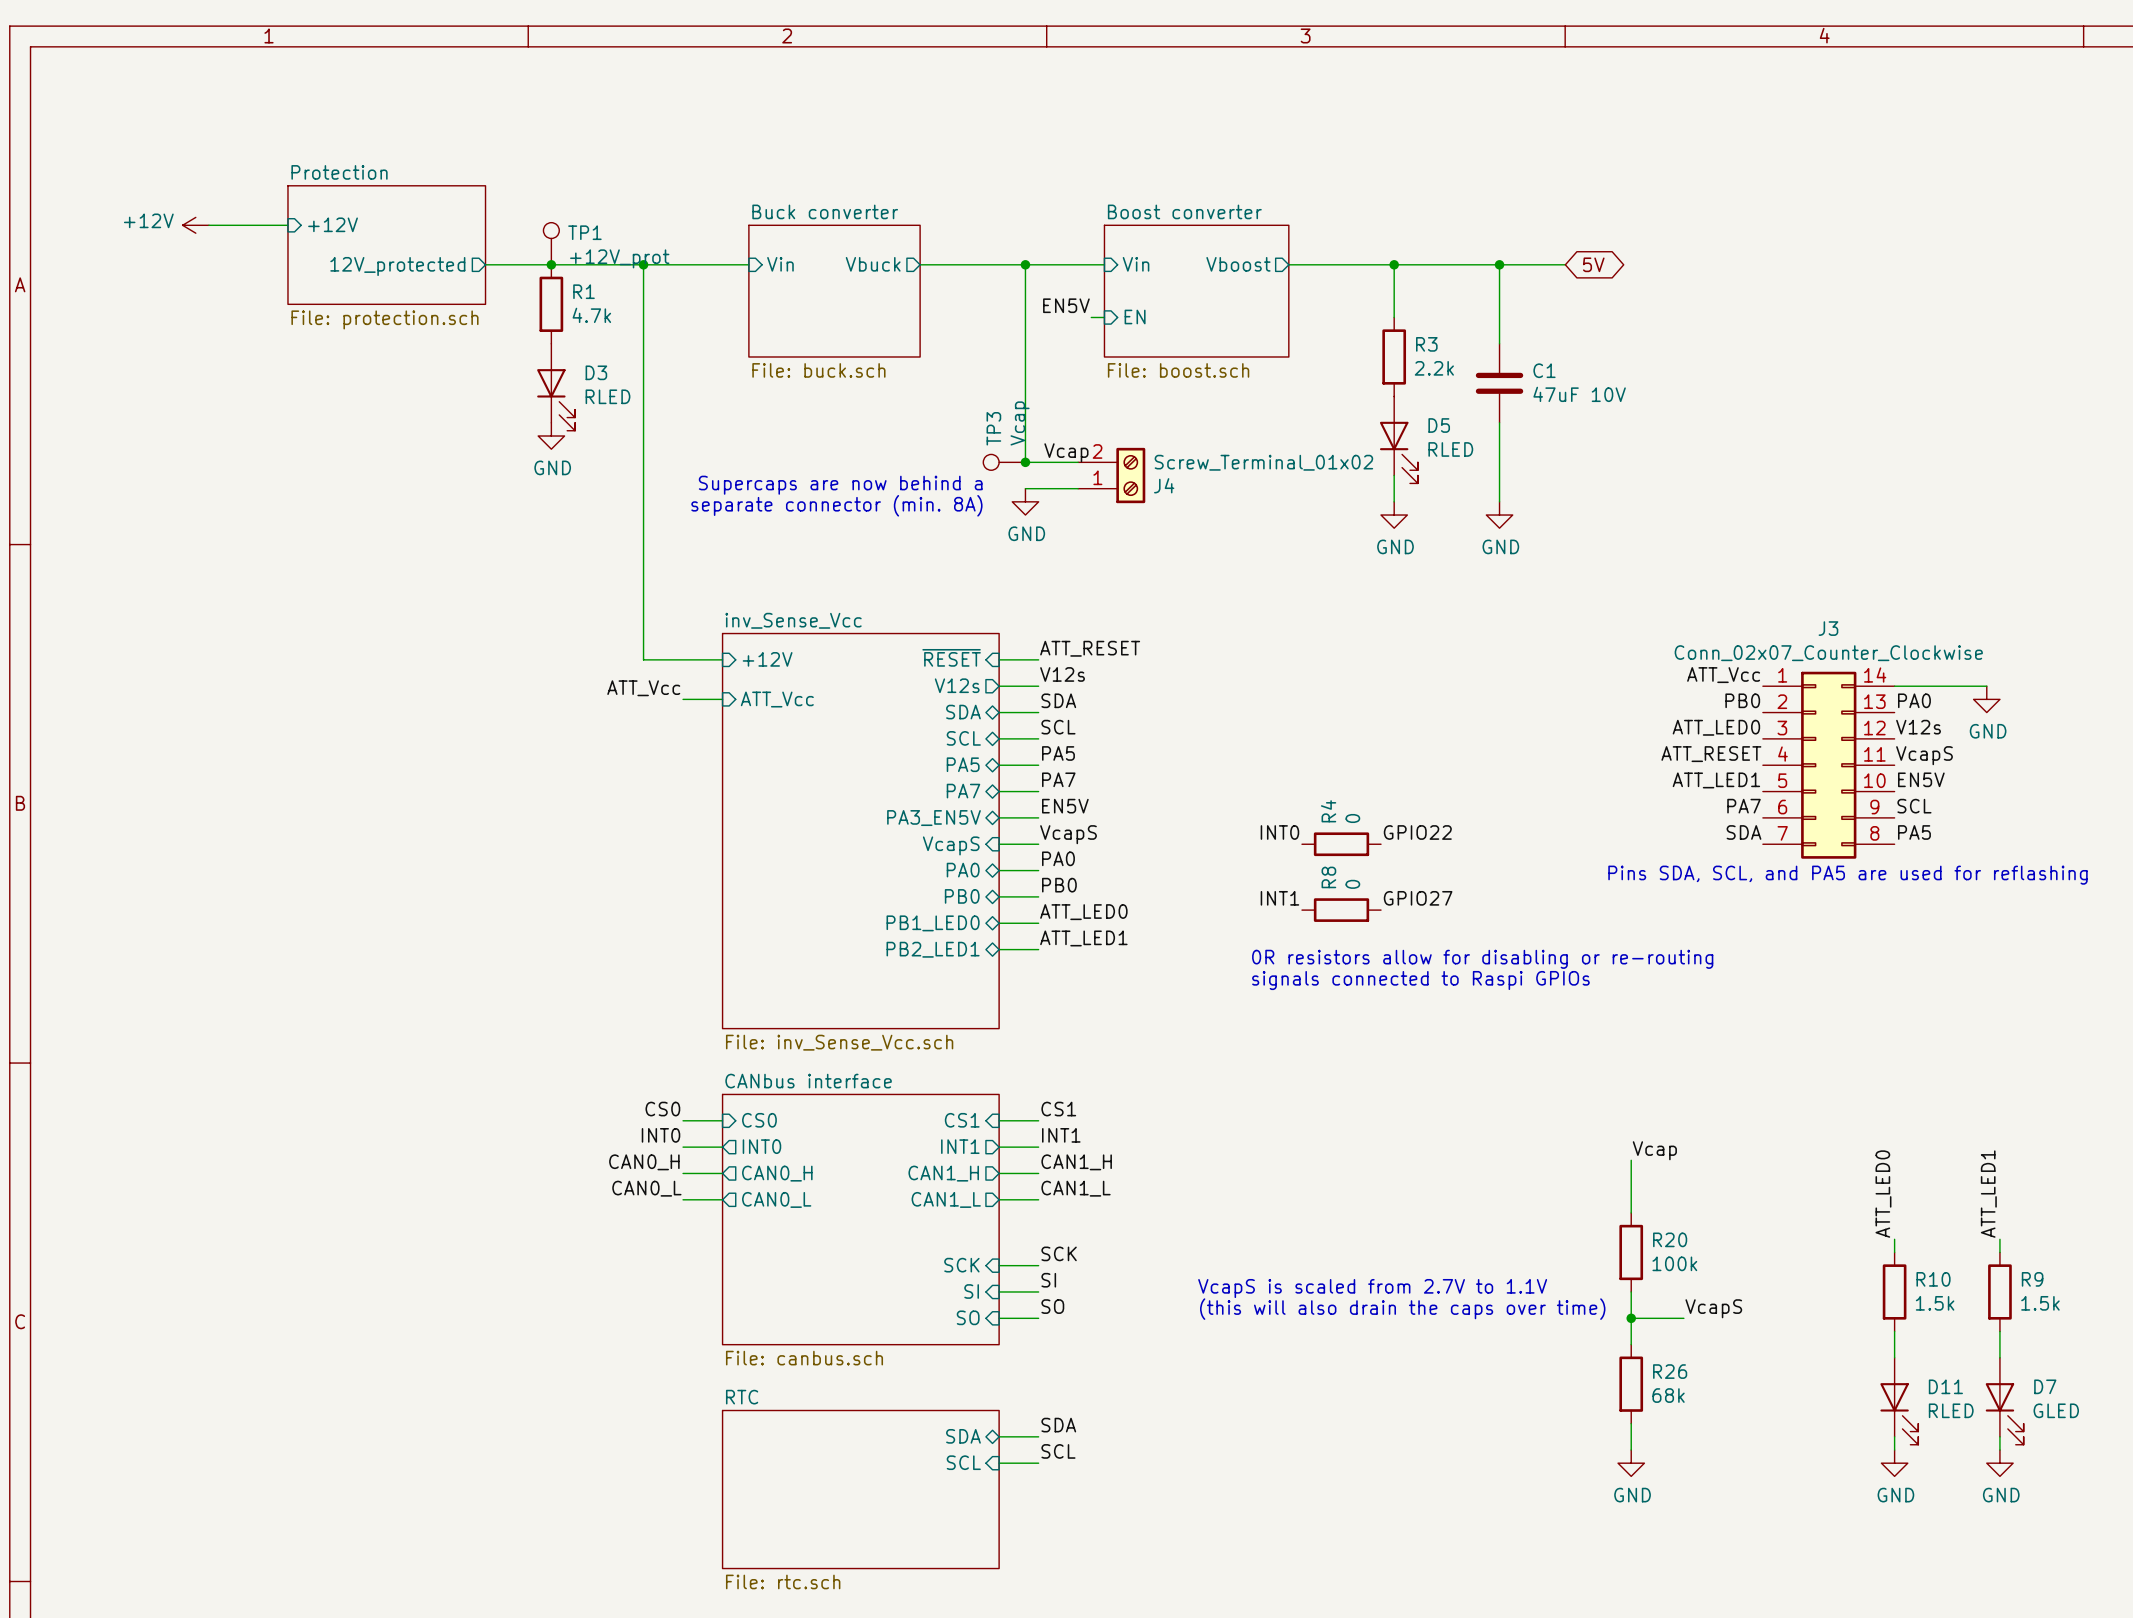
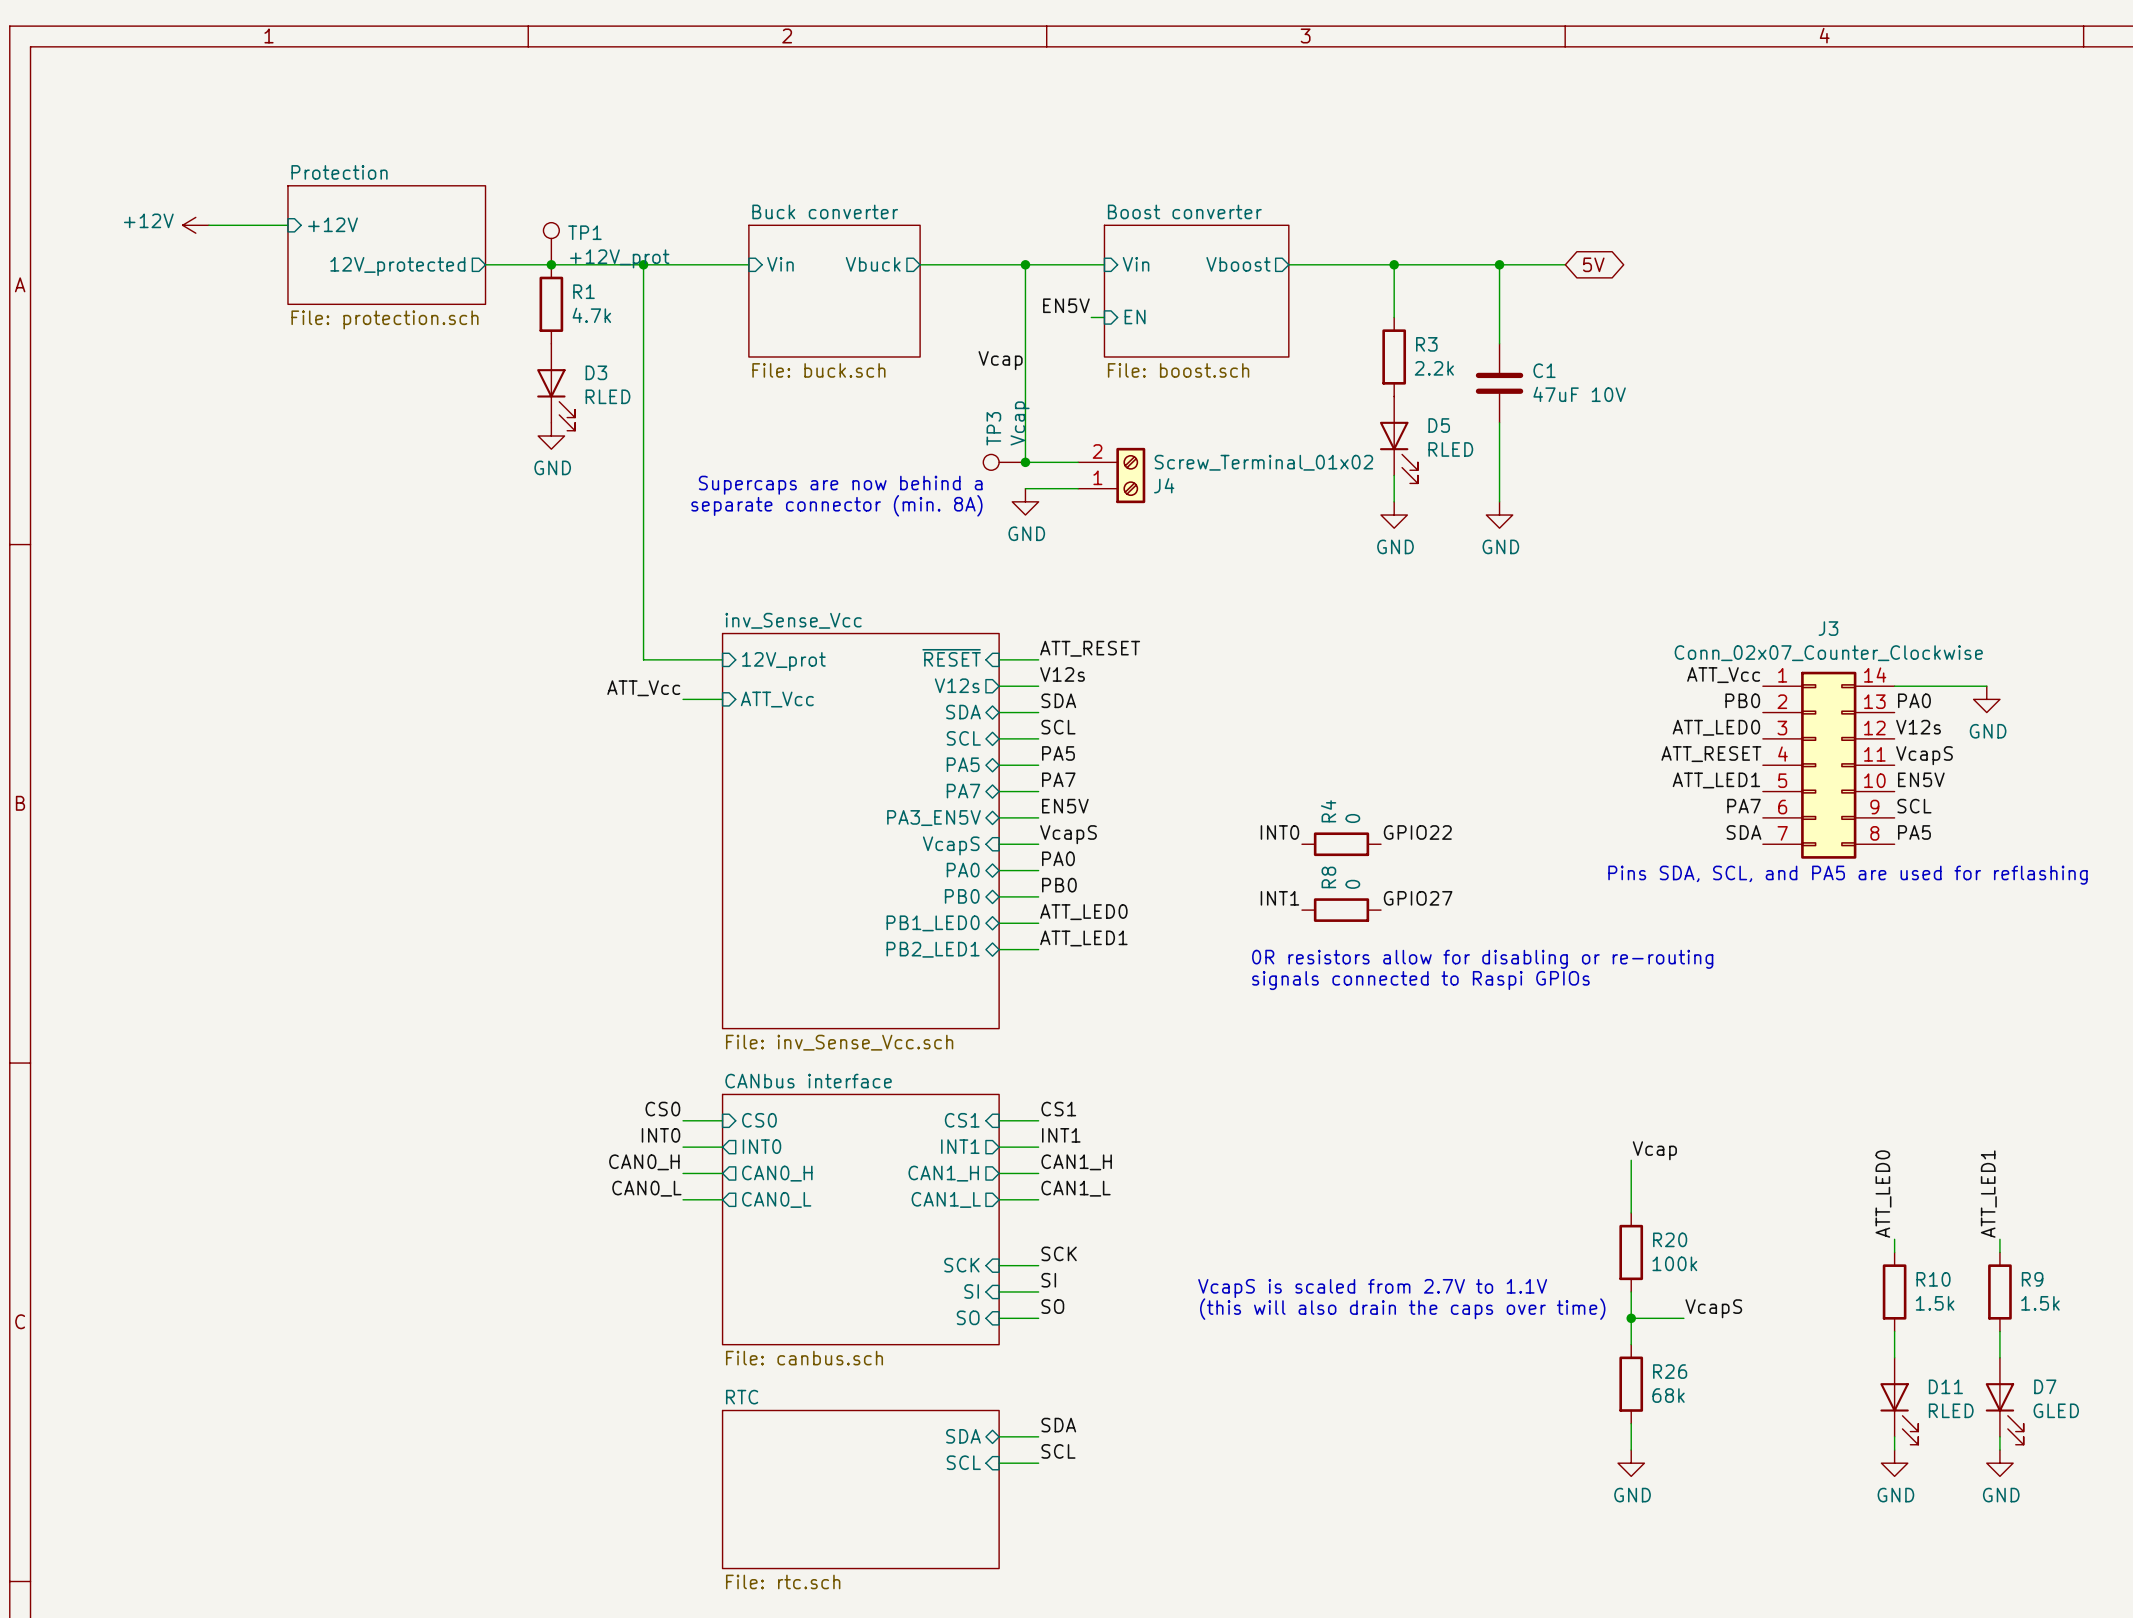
label position: Vcap (1066, 452) -> Vcap (1000, 360)
sheet pin: +12V (767, 659) -> 12V_prot (783, 661)

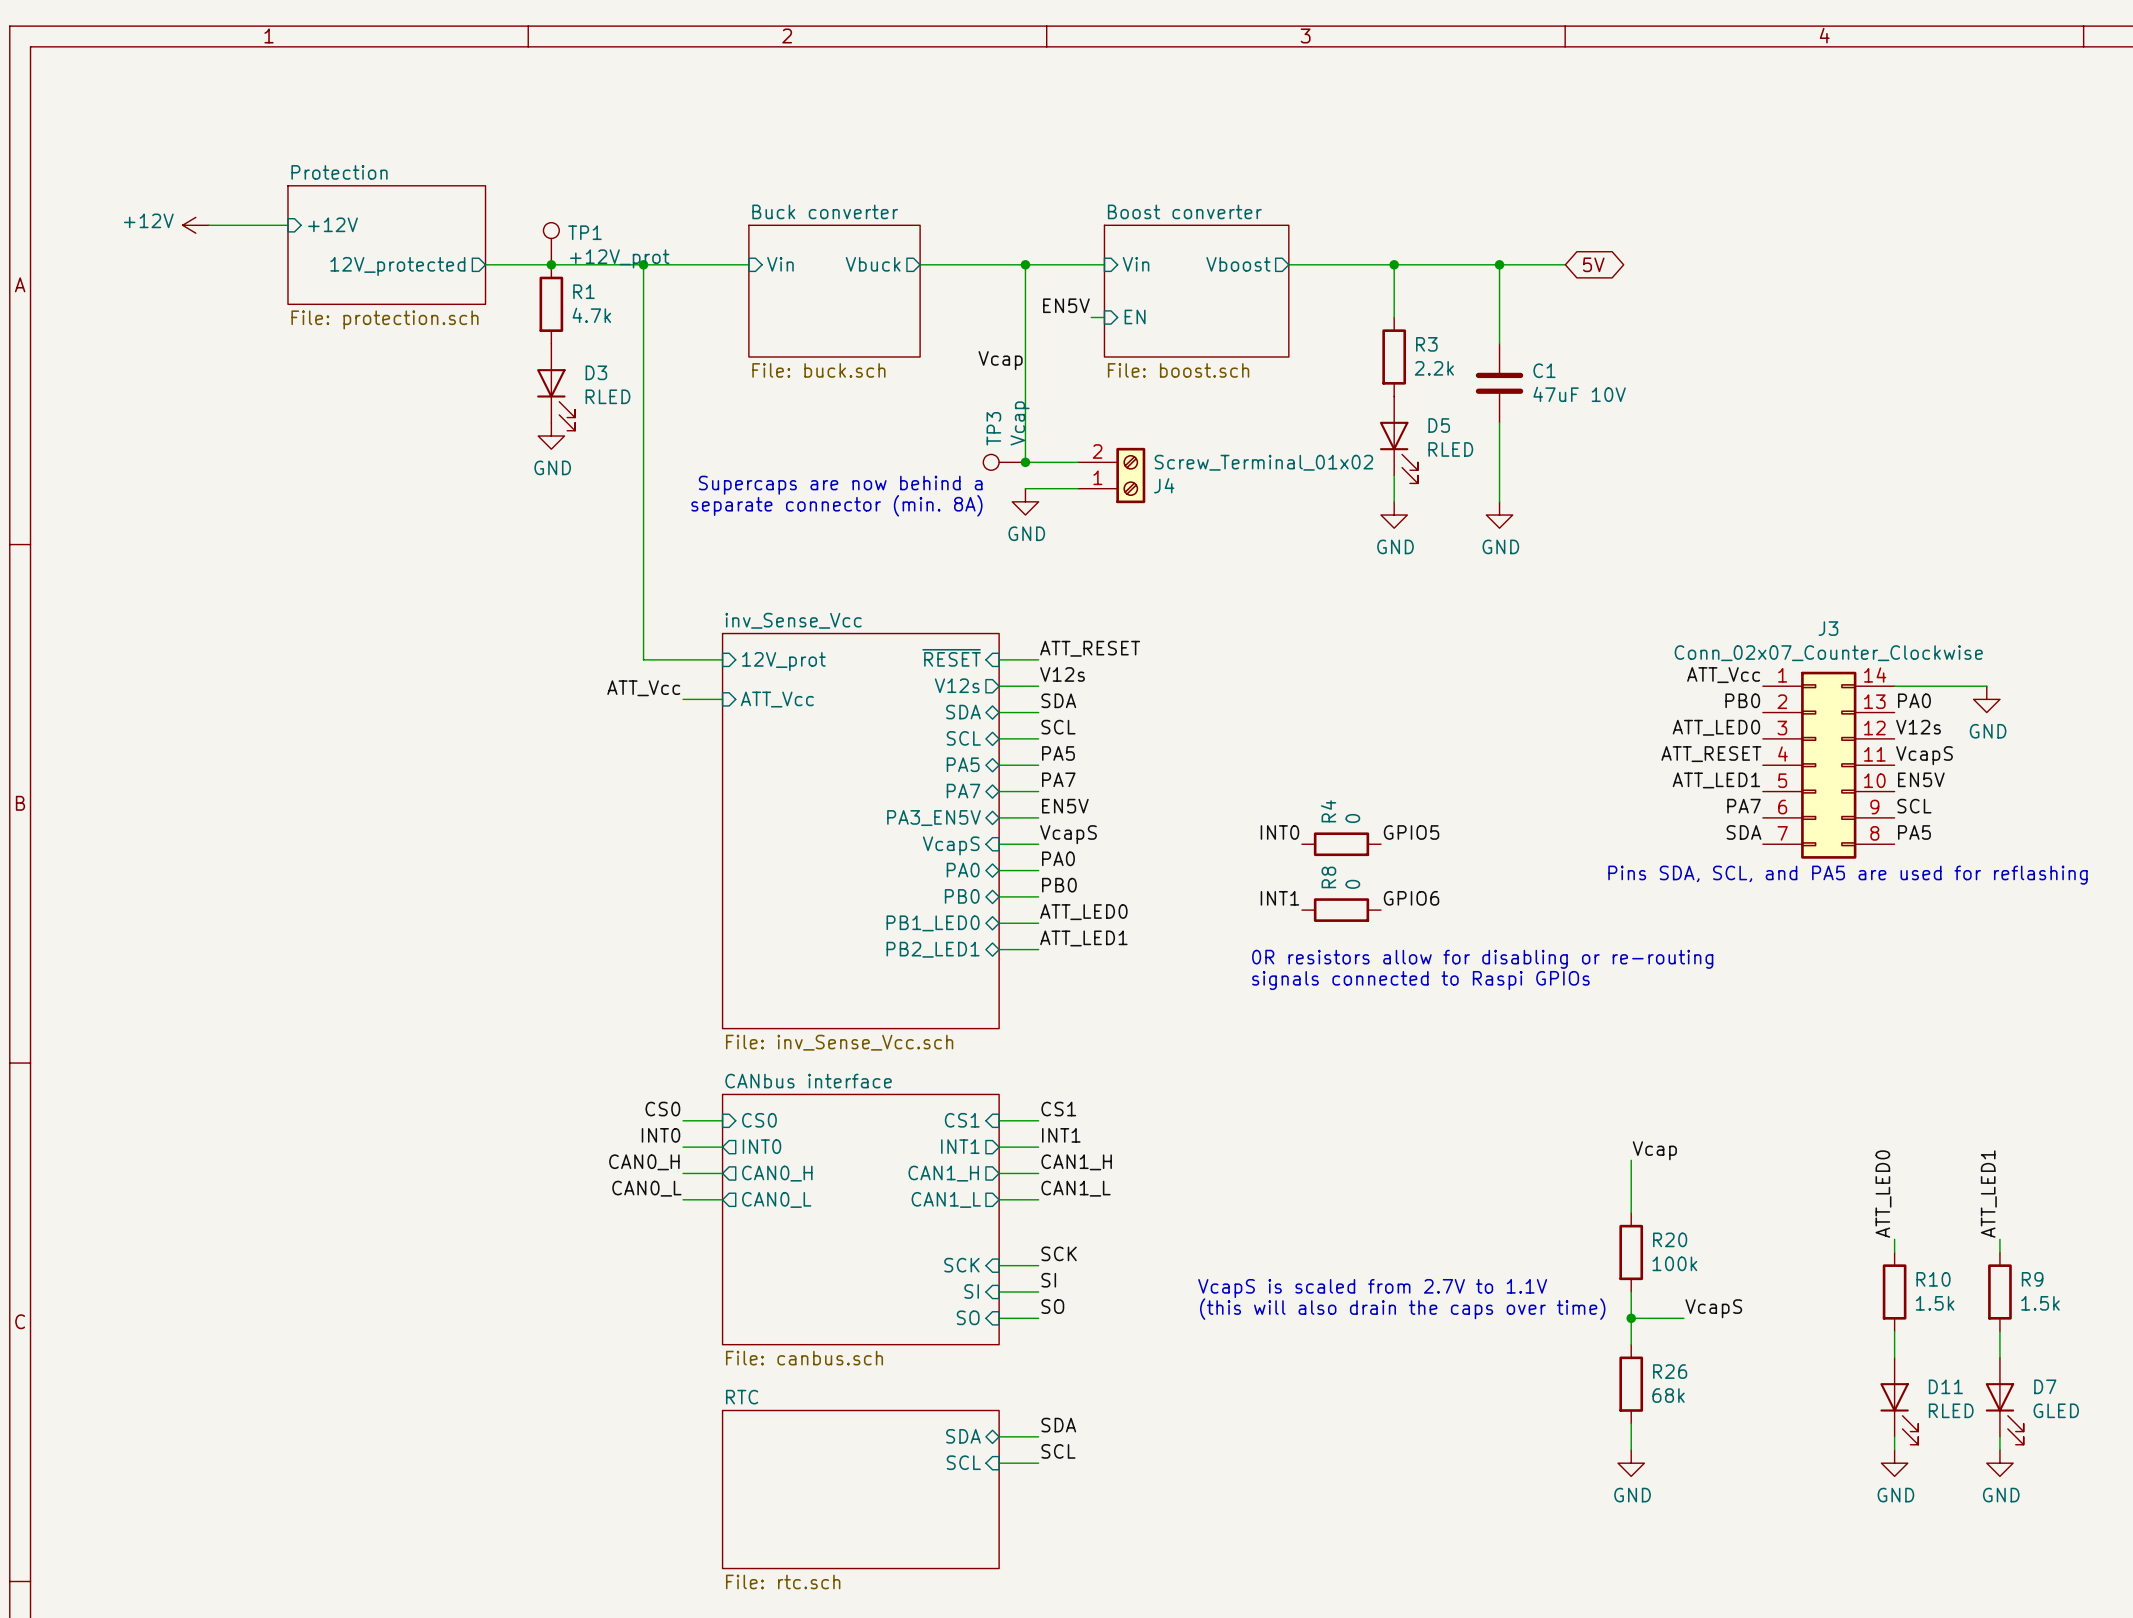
label: GPIO22 (1417, 832) -> GPIO5 (1411, 832)
label: GPIO27 (1418, 898) -> GPIO6 (1411, 898)

